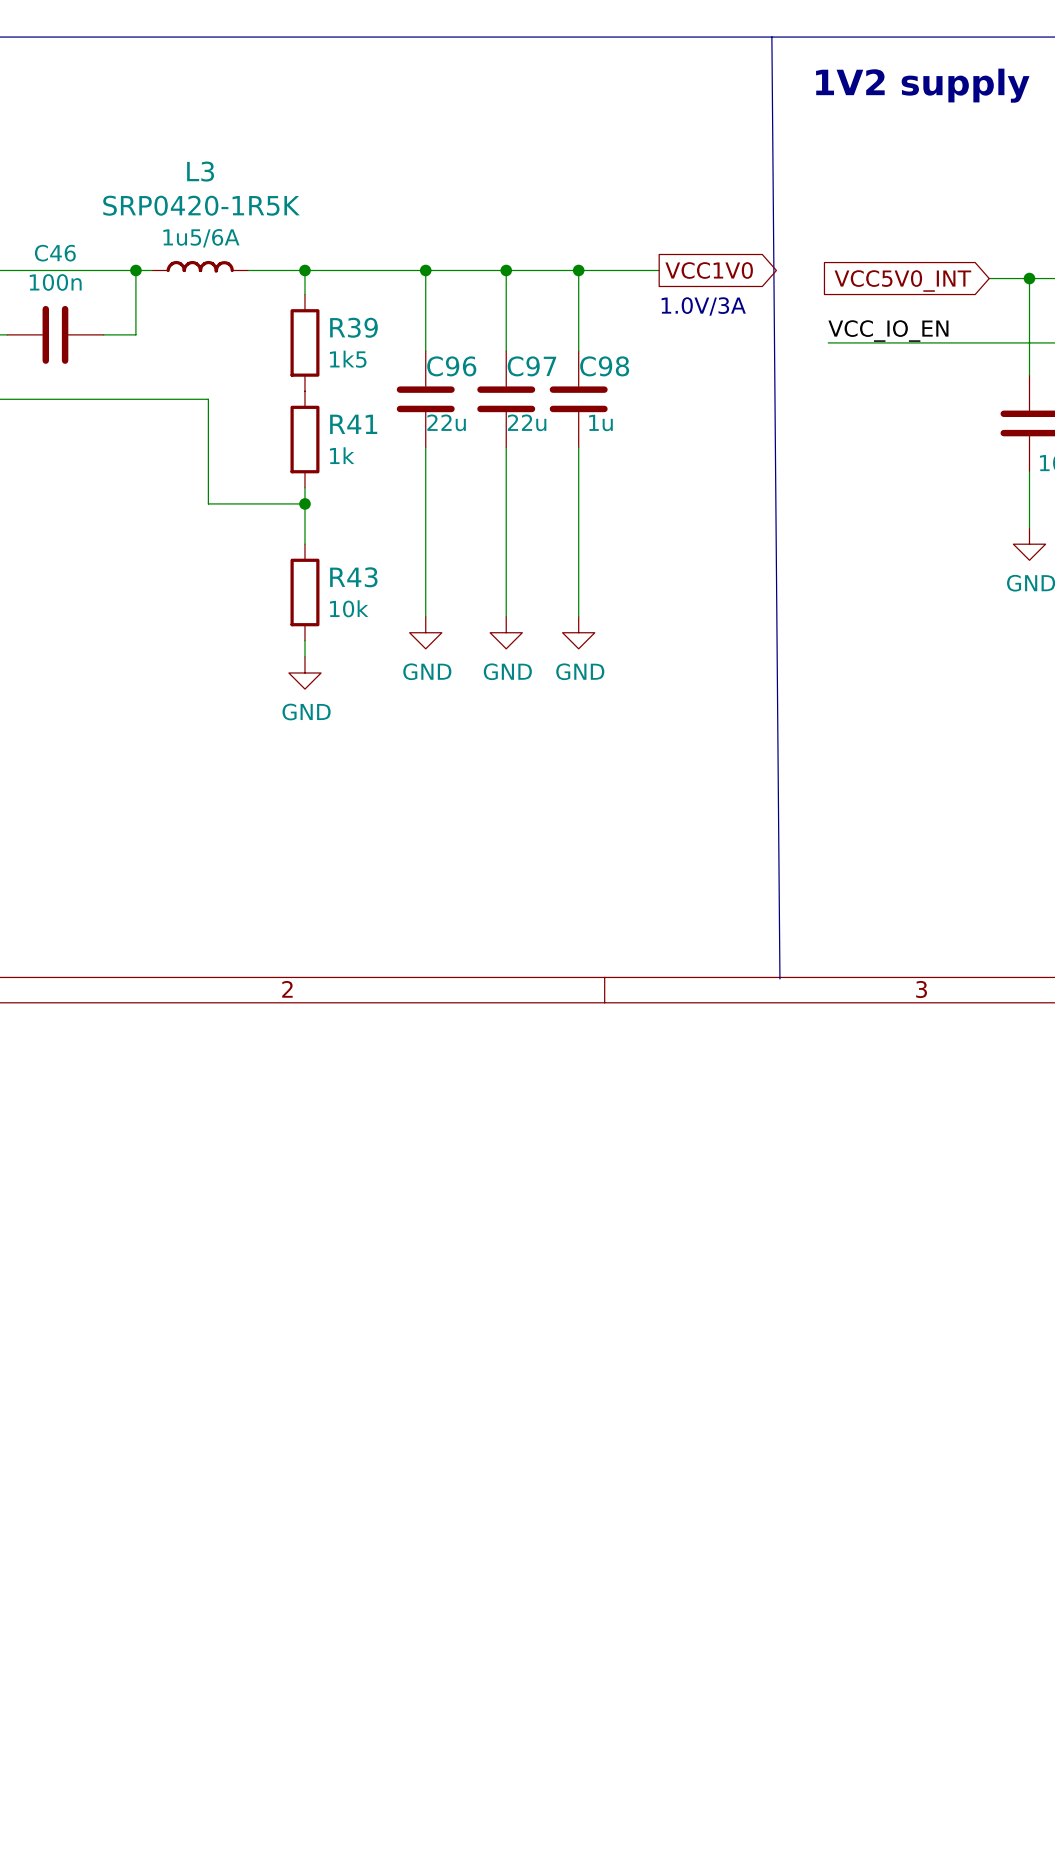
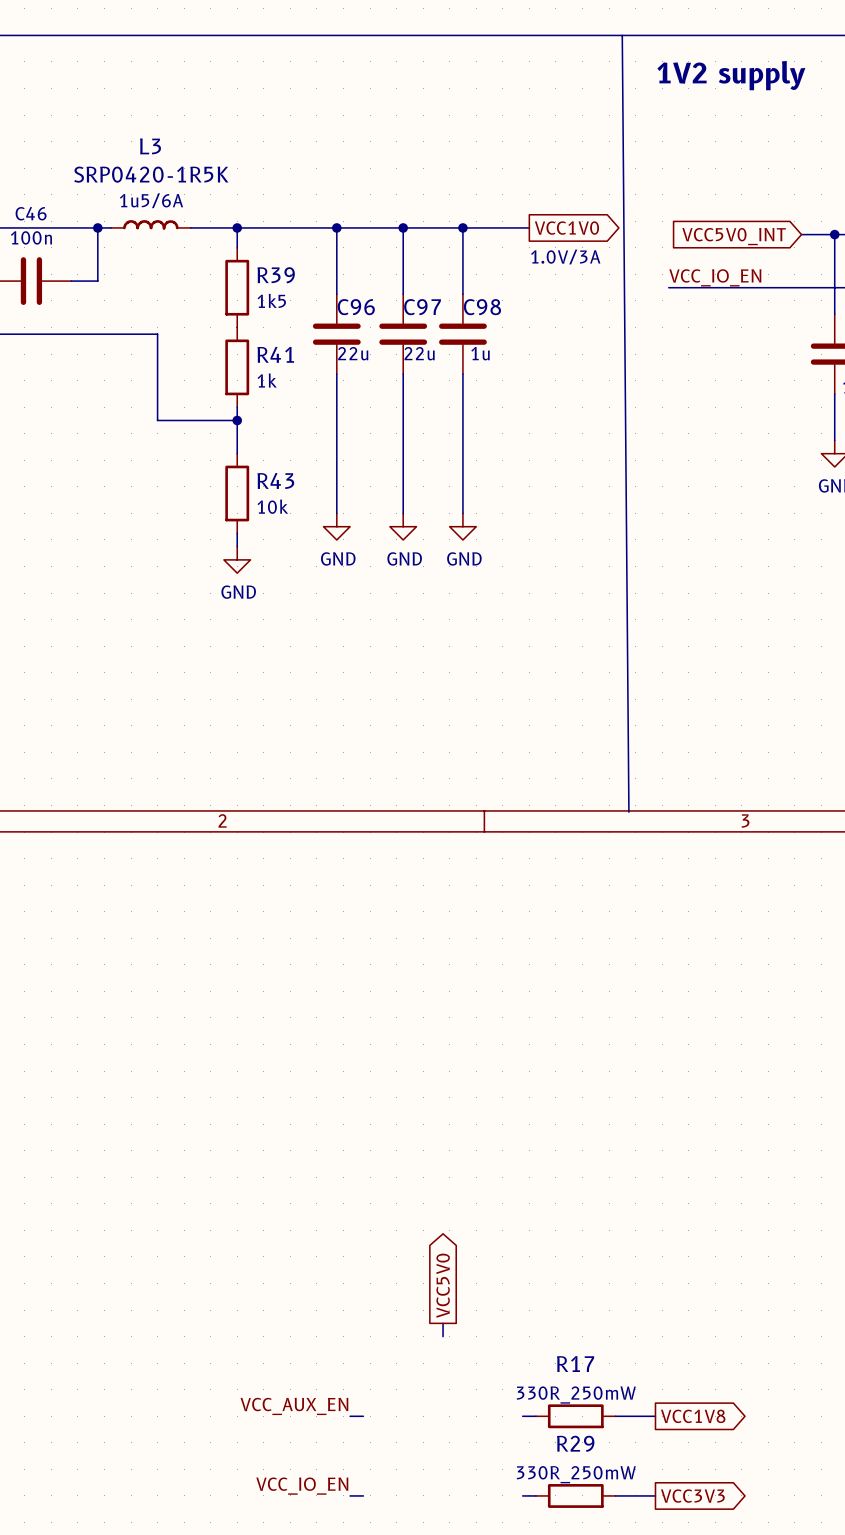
global label: none -> VCC5V0 (443, 1285)
wire: none -> (443, 1323) (443, 1336)
label: none -> VCC_AUX_EN (294, 1406)
wire: none -> (350, 1416) (363, 1416)
wire: none -> (522, 1416) (535, 1416)
R17: none -> (575, 1416)
wire: none -> (615, 1416) (655, 1416)
global label: none -> VCC1V8 (693, 1416)
label: none -> VCC_IO_EN (302, 1486)
wire: none -> (350, 1495) (363, 1495)
wire: none -> (522, 1495) (535, 1495)
R29: none -> (575, 1495)
wire: none -> (615, 1495) (655, 1495)
global label: none -> VCC3V3 (692, 1496)

